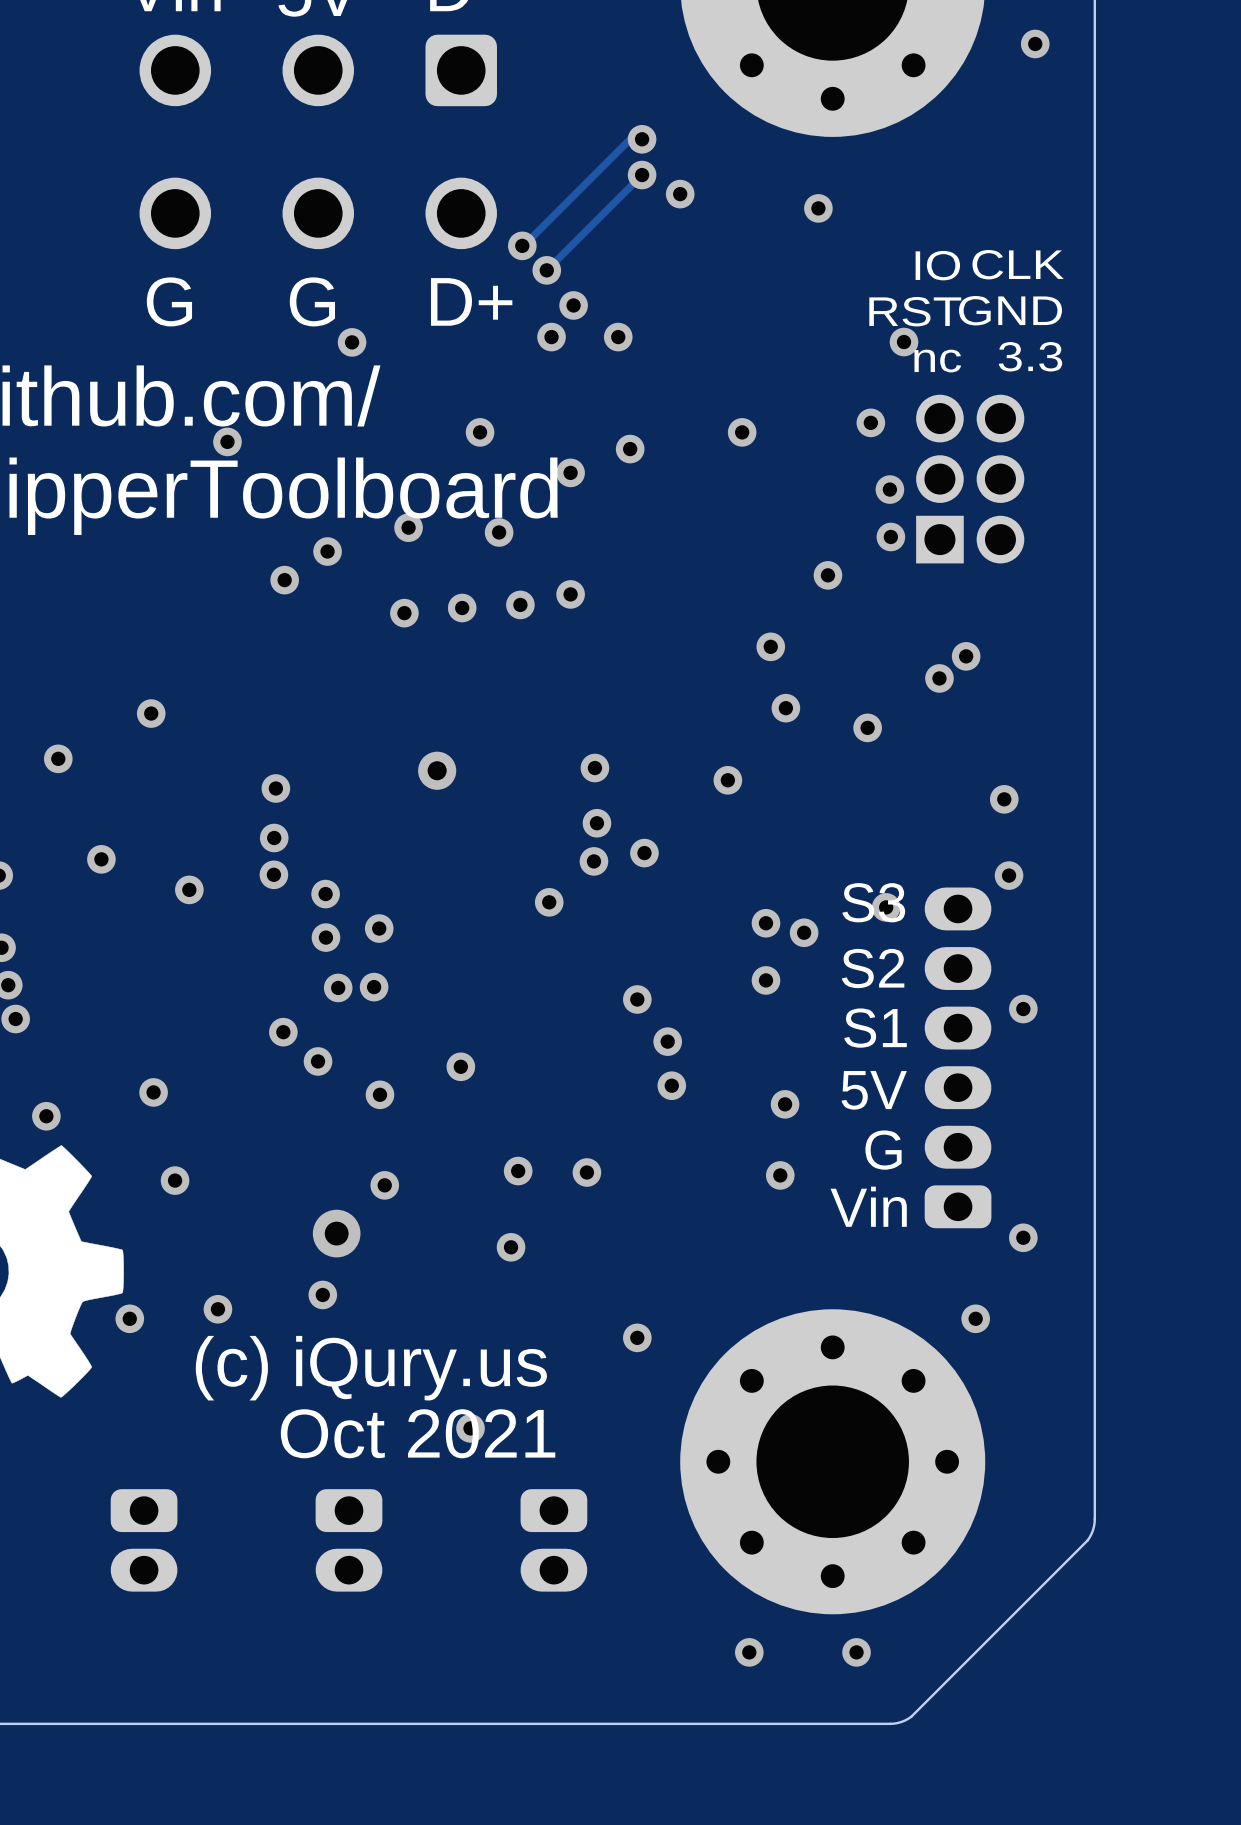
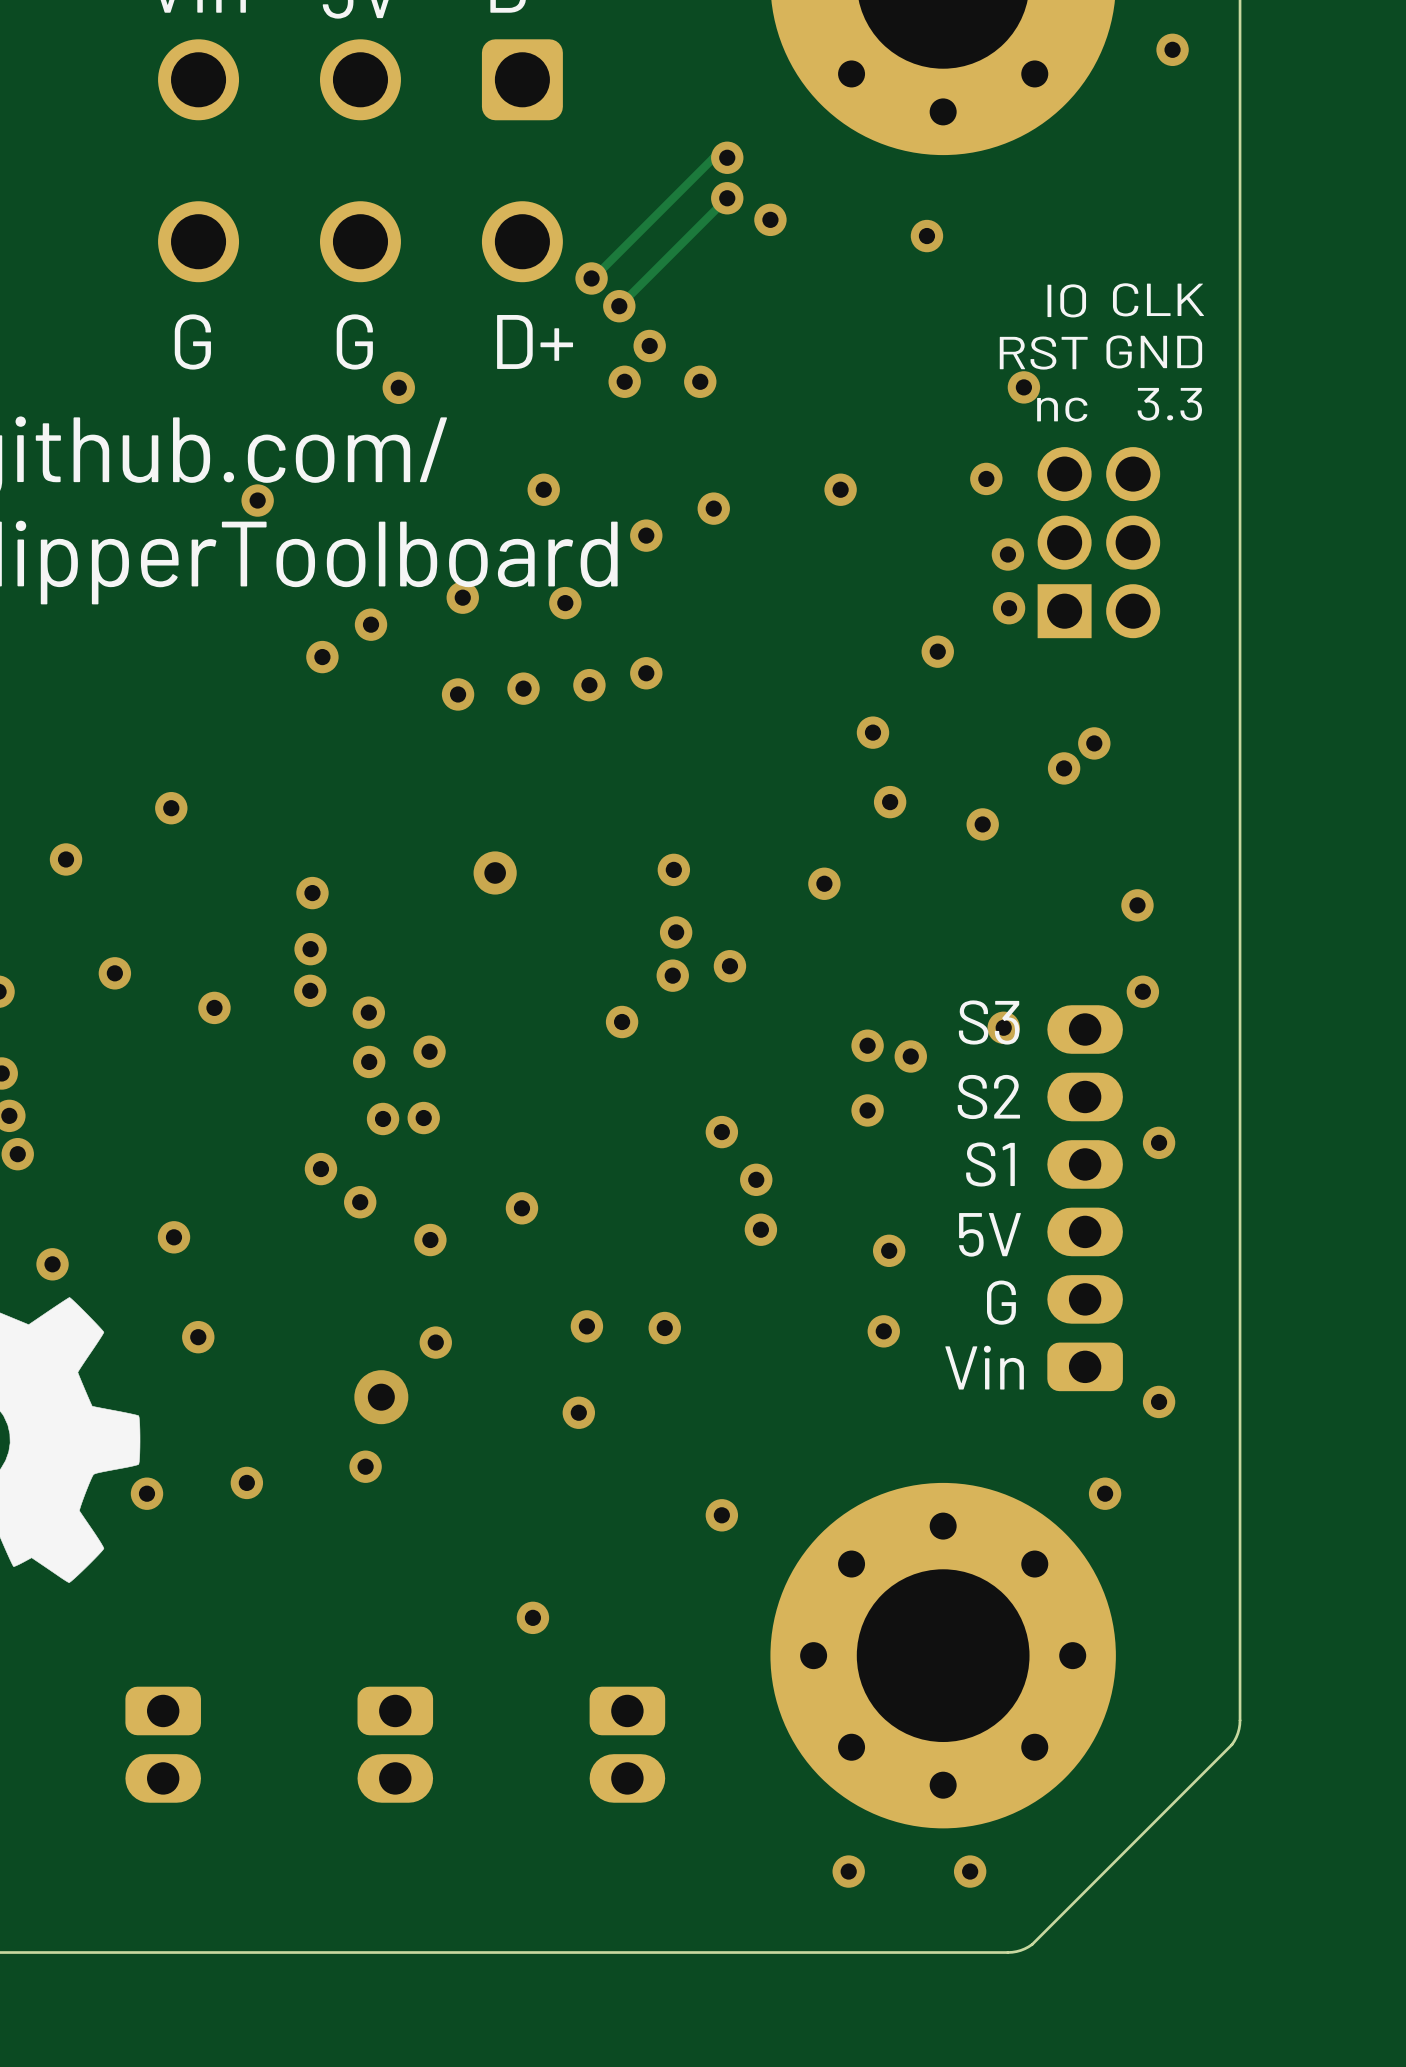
text: (c) iQury.us (371, 1368) -> none
text: Oct 2021 (418, 1433) -> none

